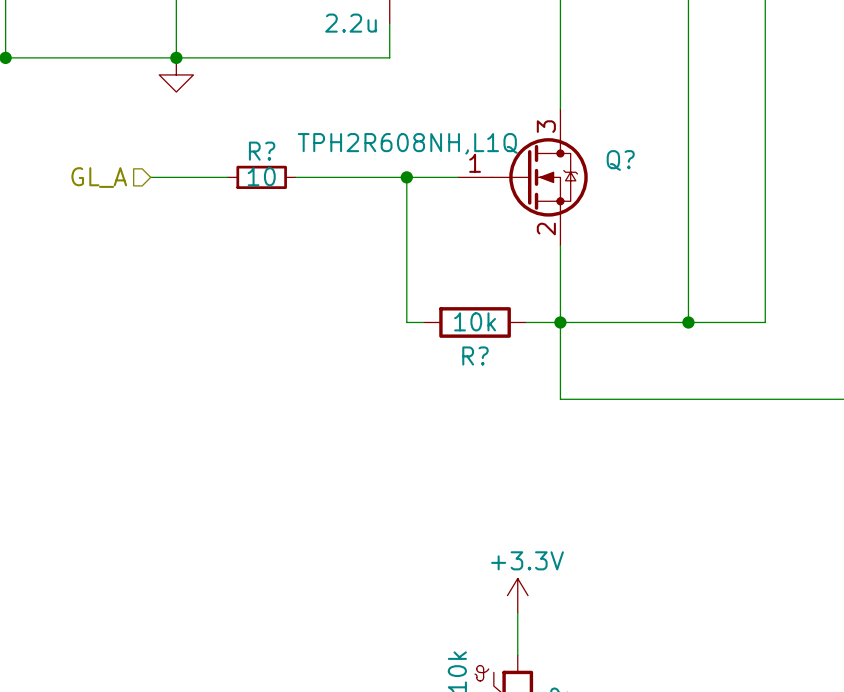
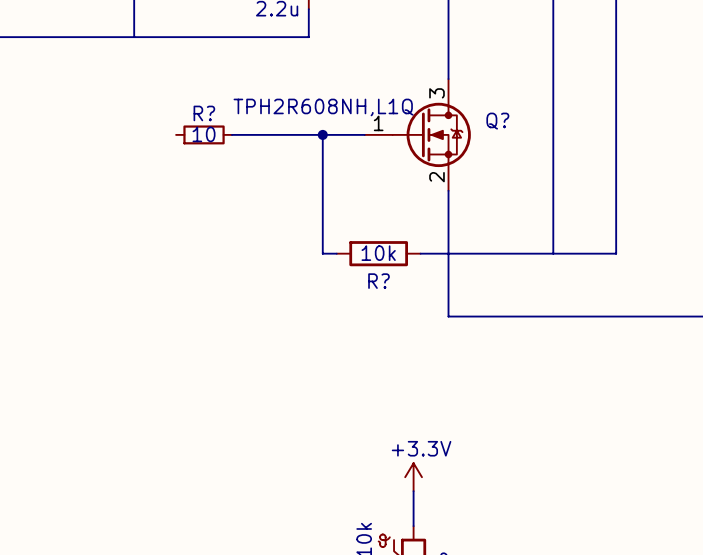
junction: (176, 57) -> none
power symbol: (176, 74) -> none
hierarchical label: GL_A (99, 177) -> none
wire: (150, 177) (227, 177) -> none
junction: (560, 322) -> none
junction: (688, 322) -> none

